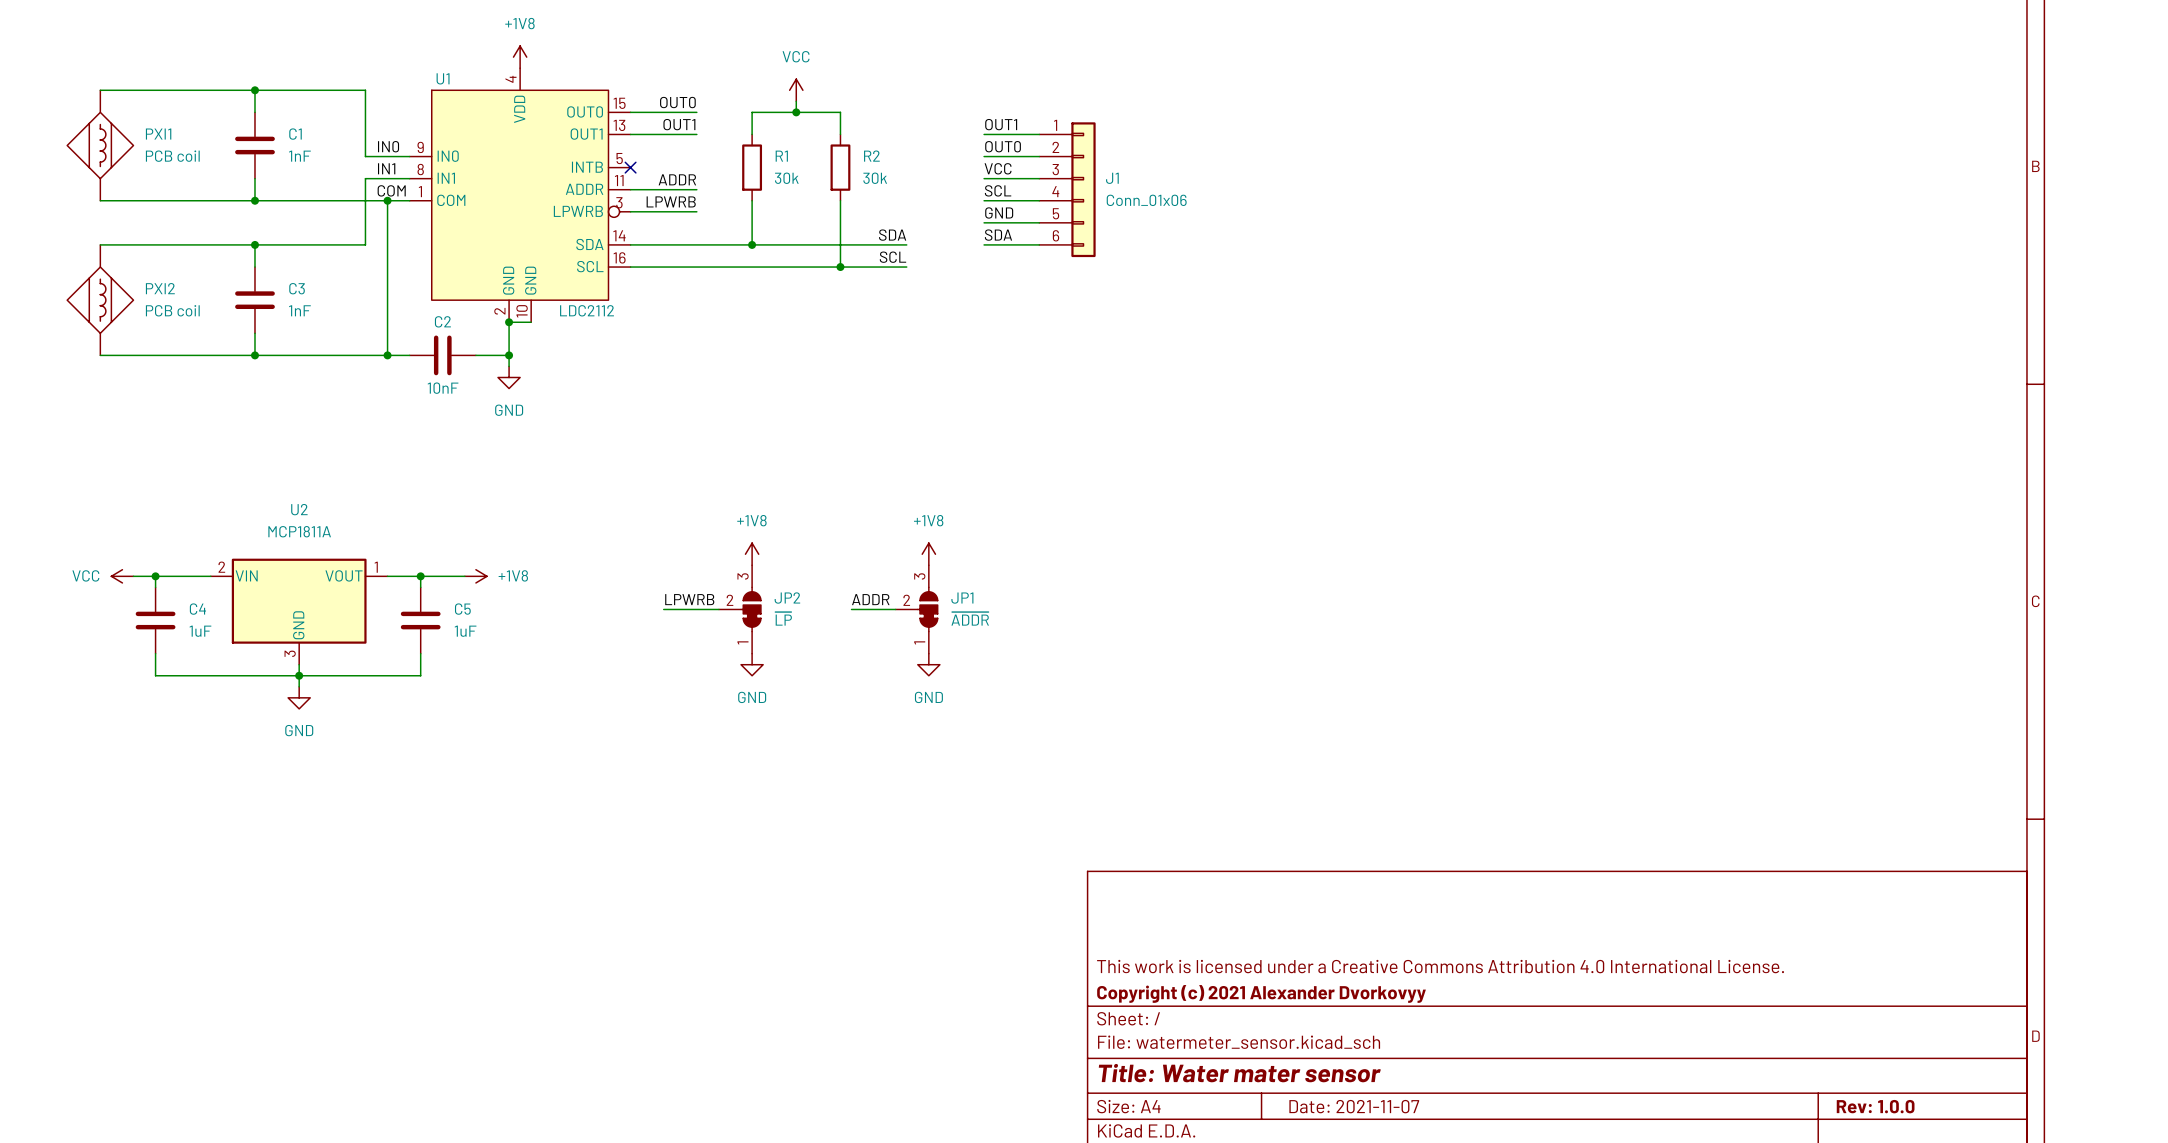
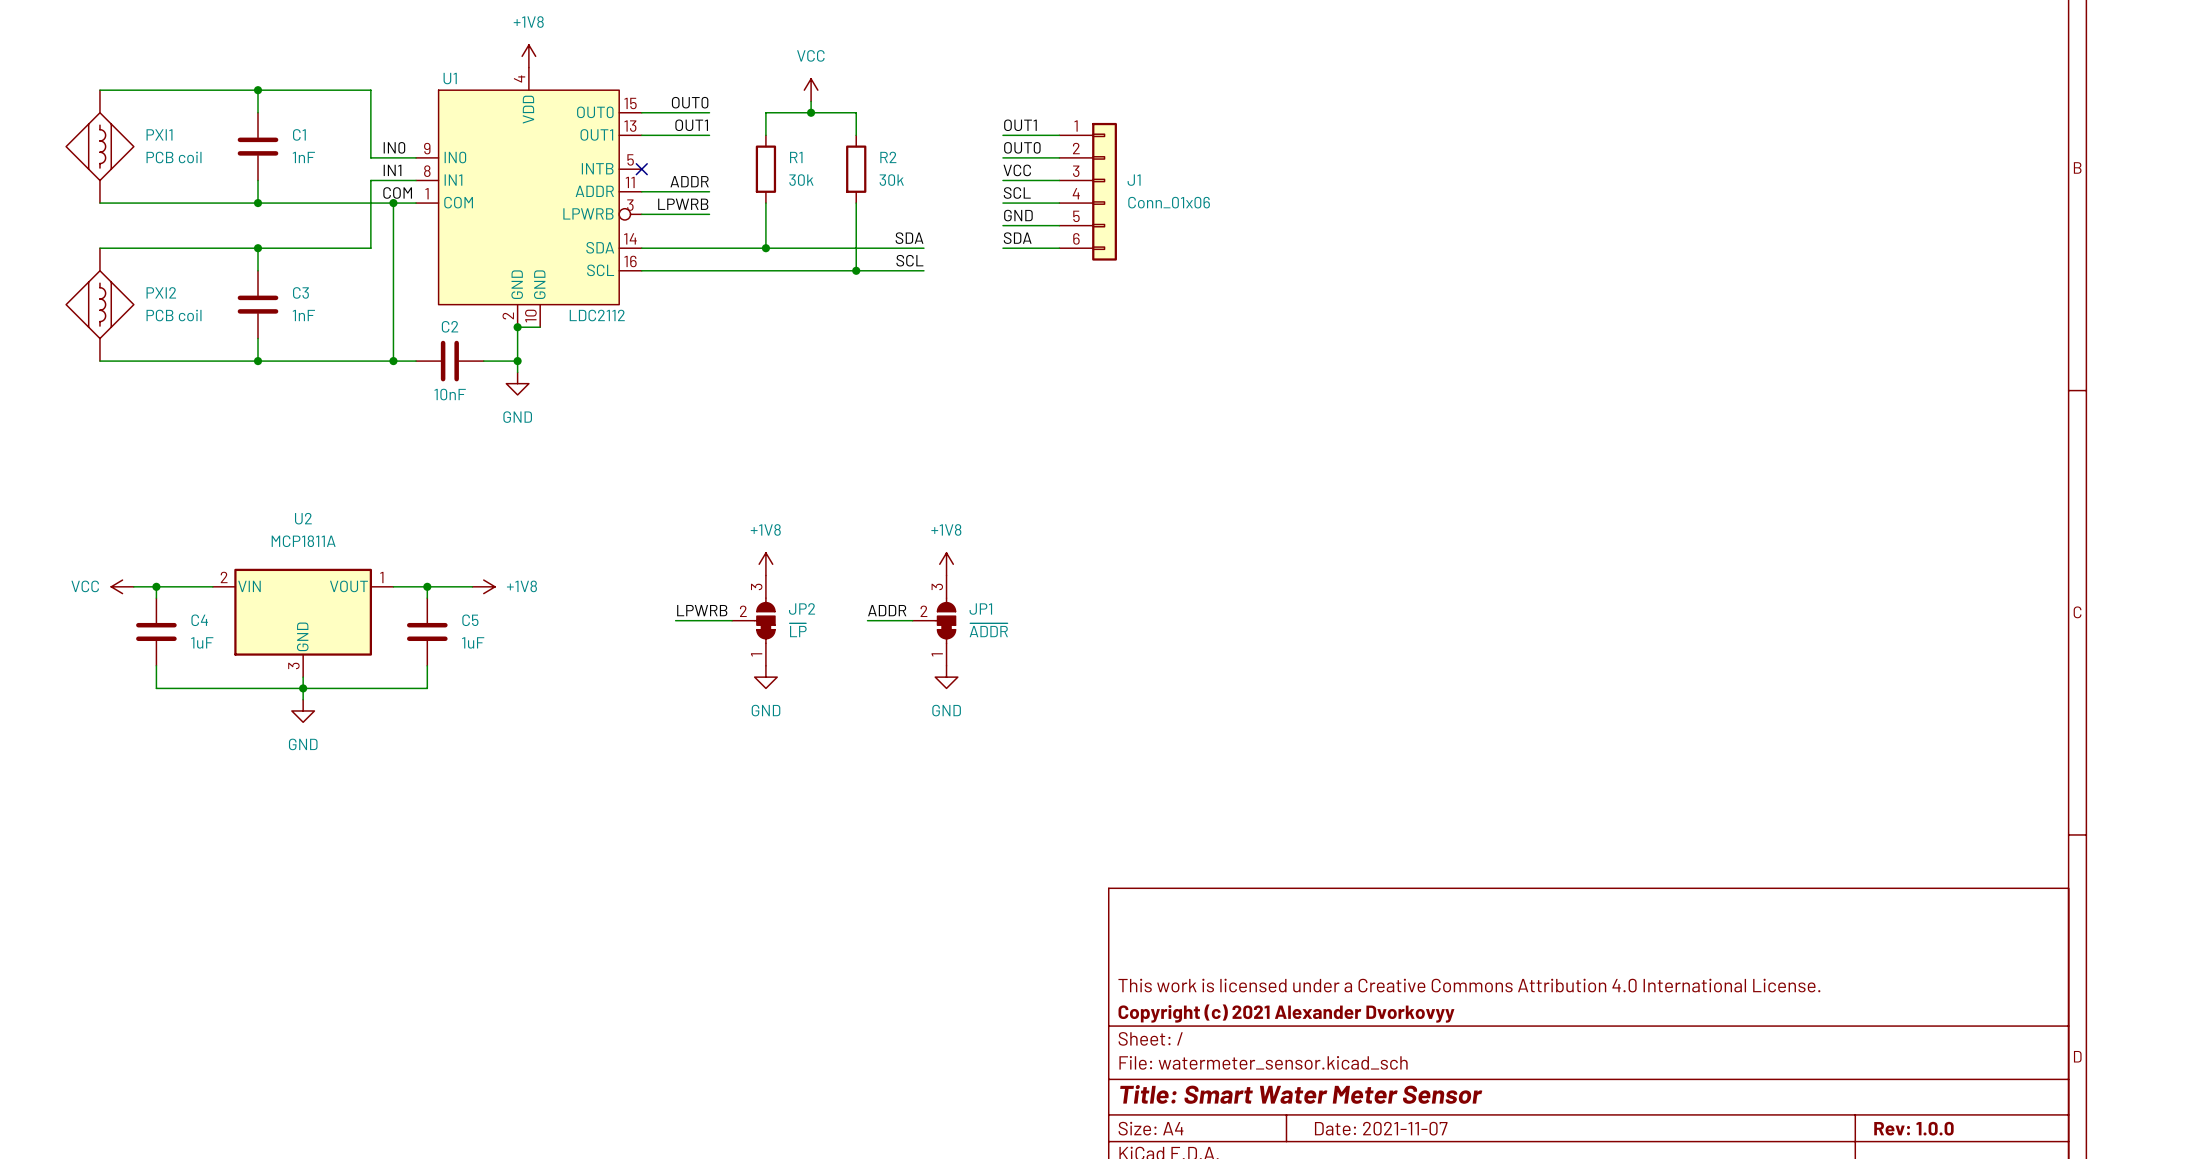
title block: Title: Water mater sensor (1239, 1073) -> Title: Smart Water Meter Sensor (1301, 1094)

